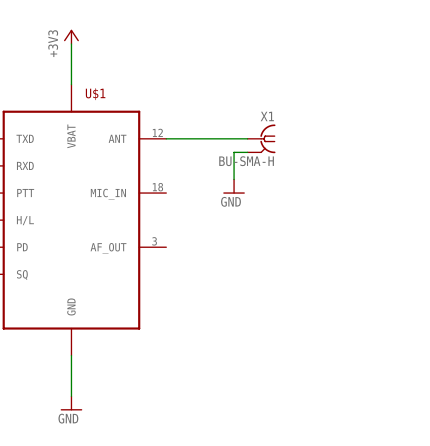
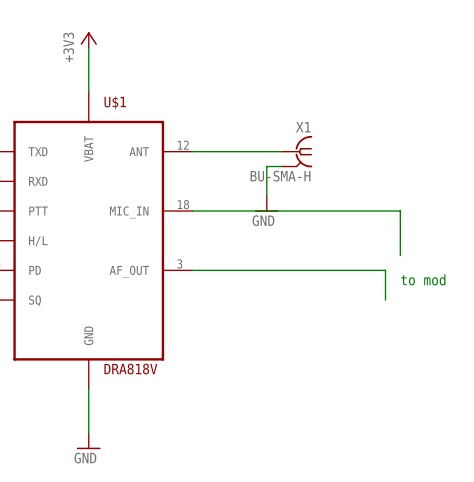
wire: none -> (192, 211) (400, 211) (400, 255)
wire: none -> (192, 270) (385, 270) (385, 300)
text: none -> to mod (423, 279)
U$1 value: none -> DRA818V (130, 369)

